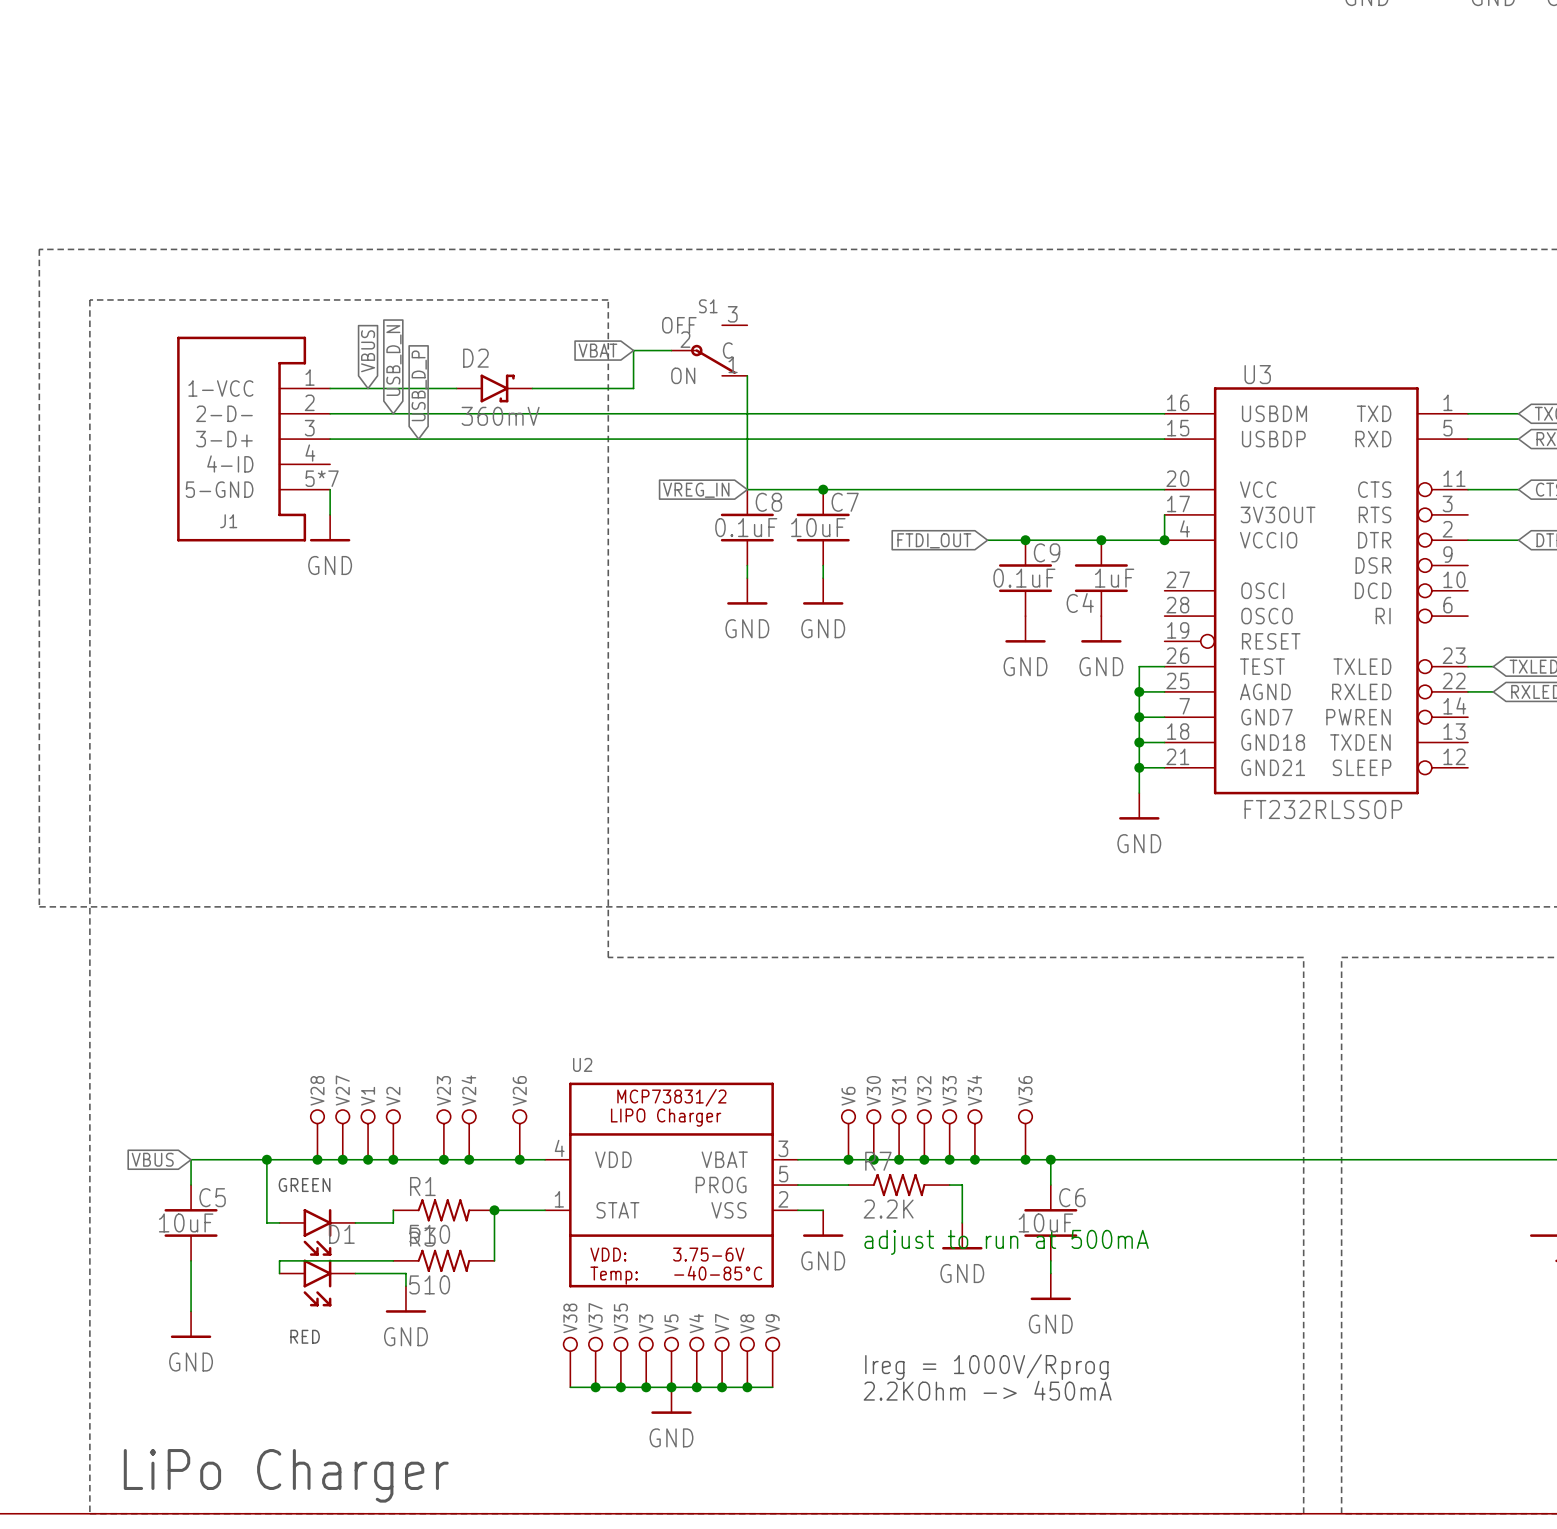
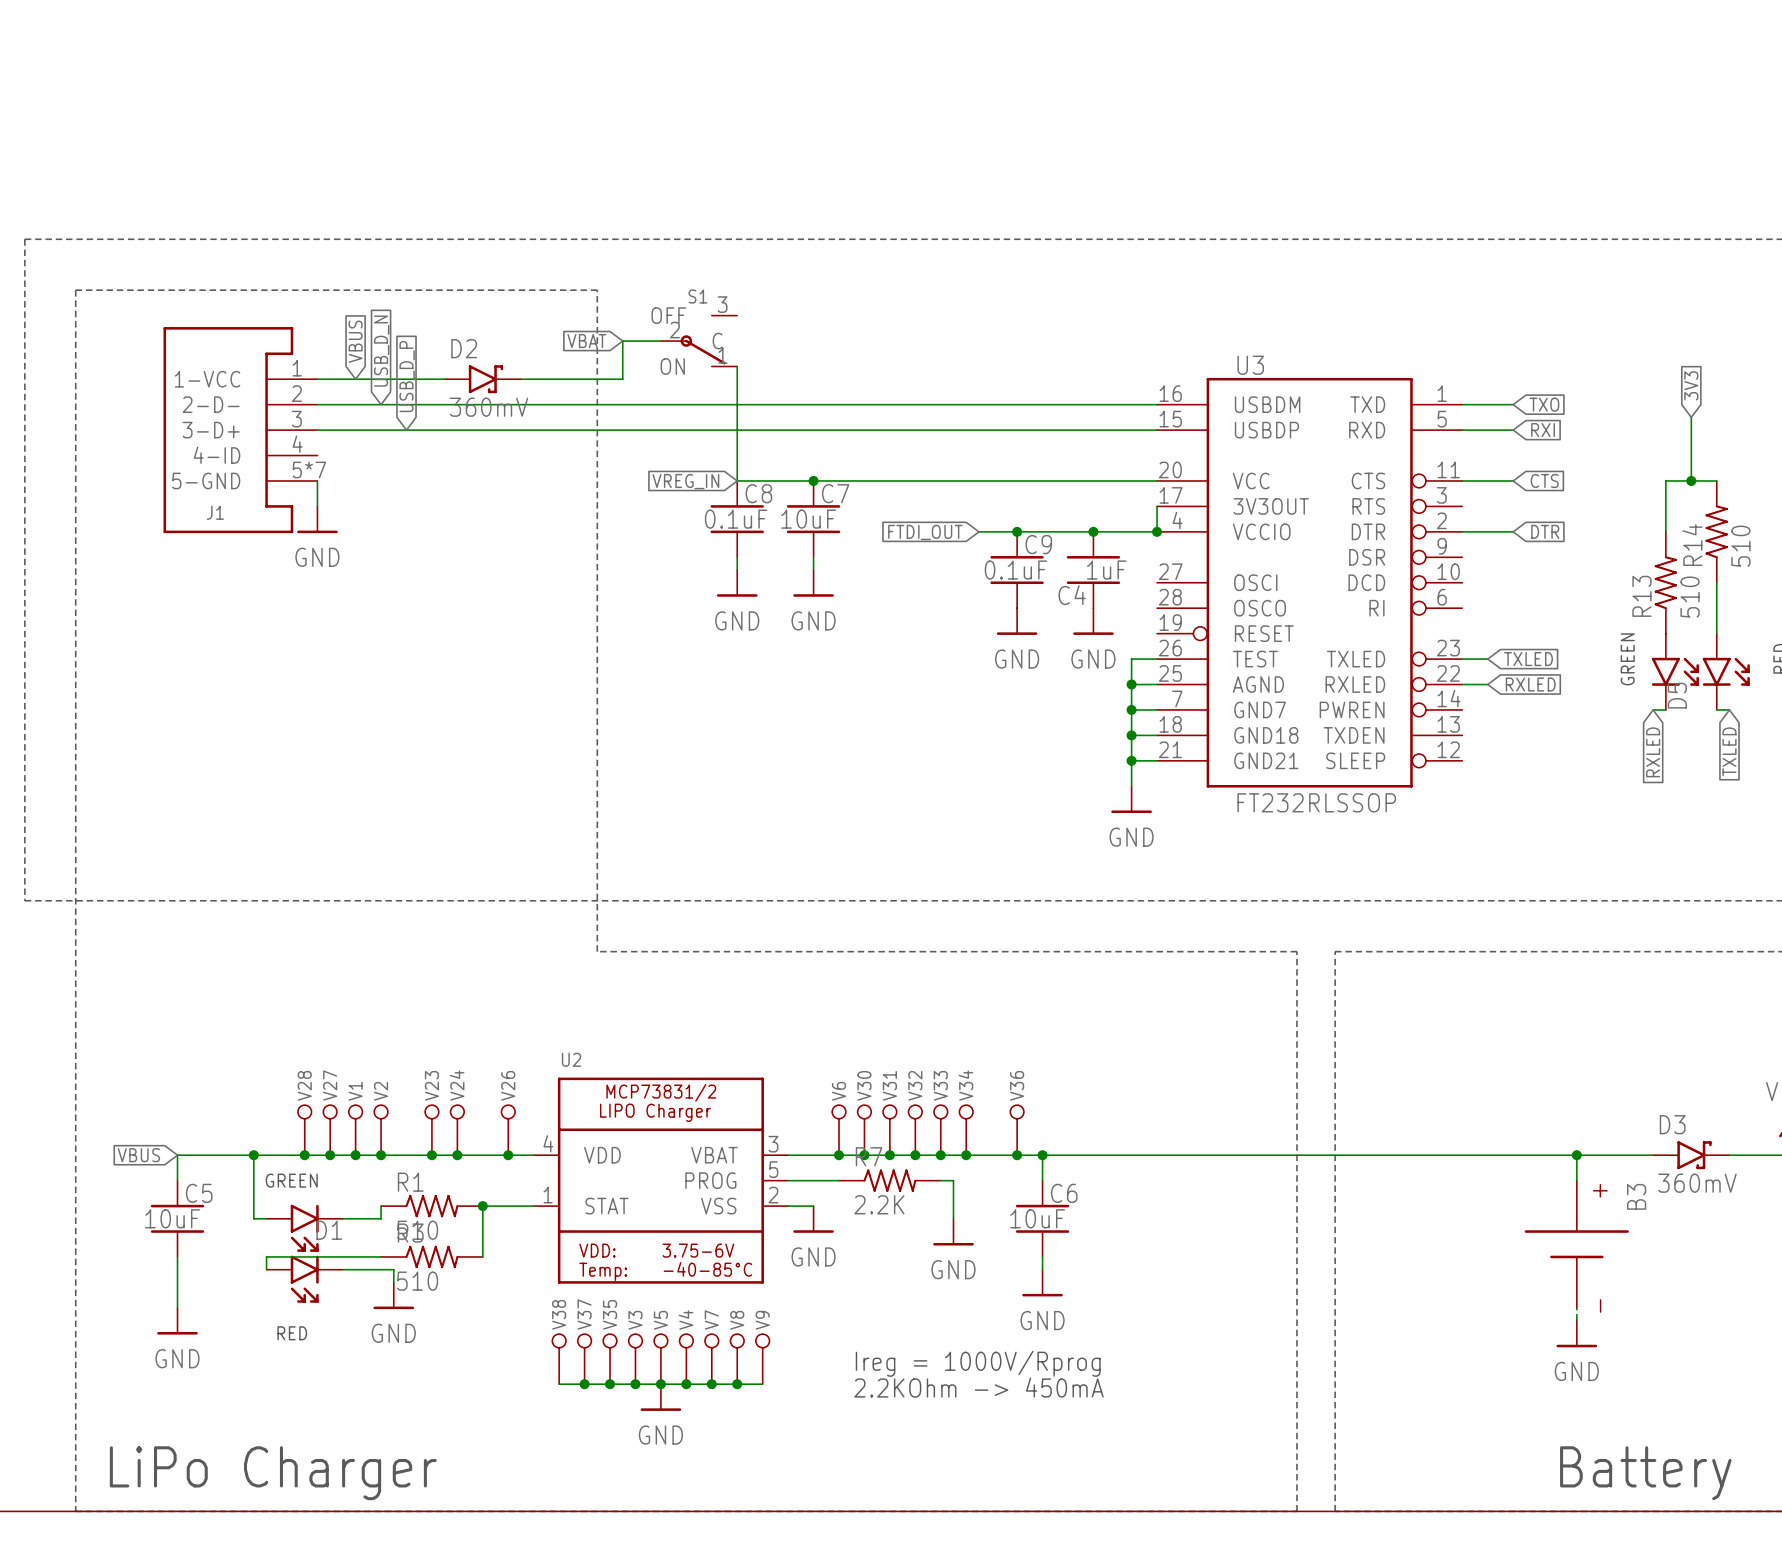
text: adjust to run at 500mA (1006, 1242) -> none

